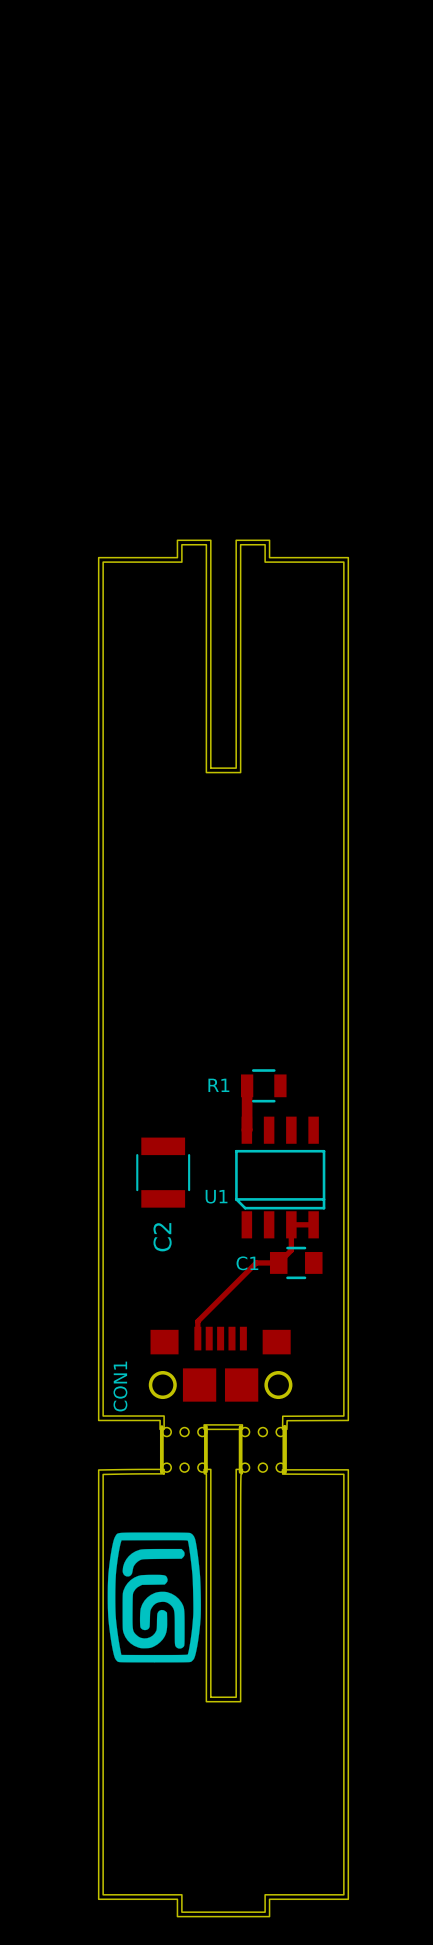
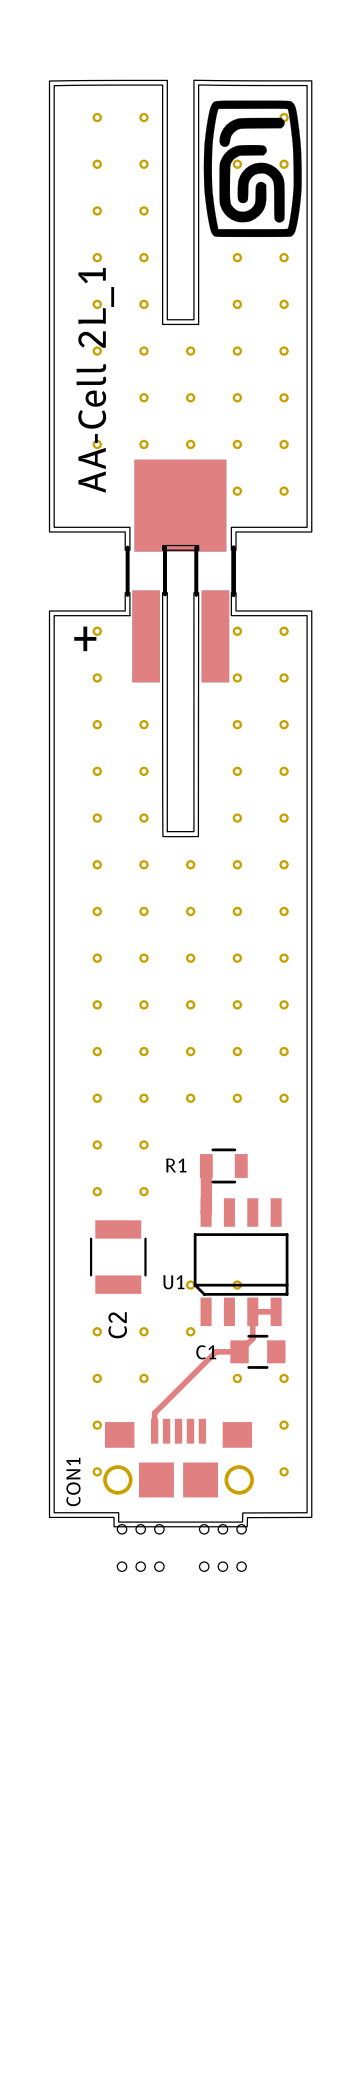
drawing: none -> [49, 80, 312, 1527]
part: none -> (97, 117)
part: none -> (143, 117)
part: none -> (284, 117)
part: none -> (97, 164)
part: none -> (143, 164)
part: none -> (237, 164)
part: none -> (284, 164)
part: none -> (97, 210)
part: none -> (143, 210)
part: none -> (97, 257)
part: none -> (143, 257)
part: none -> (237, 257)
part: none -> (284, 257)
part: none -> (97, 304)
part: none -> (143, 304)
part: none -> (237, 304)
part: none -> (284, 304)
part: none -> (97, 351)
part: none -> (143, 351)
part: none -> (190, 351)
part: none -> (237, 351)
part: none -> (284, 351)
text: none -> AA-Cell 2L_1 (95, 380)
part: none -> (143, 397)
part: none -> (190, 397)
part: none -> (237, 397)
part: none -> (284, 397)
part: none -> (97, 444)
part: none -> (143, 444)
part: none -> (190, 444)
part: none -> (237, 444)
part: none -> (284, 444)
part: none -> (237, 491)
part: none -> (284, 491)
part: none -> (180, 505)
board edge: none -> (127, 547) (127, 594)
board edge: none -> (164, 547) (164, 594)
board edge: none -> (196, 547) (196, 594)
board edge: none -> (233, 547) (233, 594)
drawing: [98, 540, 349, 1917] -> none
part: none -> (97, 631)
part: none -> (237, 631)
part: none -> (284, 631)
part: none -> (180, 636)
text: none -> + (85, 638)
part: none -> (97, 677)
part: none -> (237, 677)
part: none -> (284, 677)
part: none -> (97, 724)
part: none -> (143, 724)
part: none -> (237, 724)
part: none -> (284, 724)
part: none -> (97, 771)
part: none -> (143, 771)
part: none -> (237, 771)
part: none -> (284, 771)
part: none -> (97, 818)
part: none -> (143, 818)
part: none -> (237, 818)
part: none -> (284, 818)
part: none -> (97, 864)
part: none -> (143, 864)
part: none -> (190, 864)
part: none -> (237, 864)
part: none -> (284, 864)
part: none -> (97, 911)
part: none -> (143, 911)
part: none -> (190, 911)
part: none -> (237, 911)
part: none -> (284, 911)
part: none -> (97, 958)
part: none -> (143, 958)
part: none -> (190, 958)
part: none -> (237, 958)
part: none -> (284, 958)
part: none -> (97, 1004)
part: none -> (143, 1004)
part: none -> (190, 1004)
part: none -> (237, 1004)
part: none -> (284, 1004)
part: none -> (97, 1051)
part: none -> (143, 1051)
part: none -> (190, 1051)
part: none -> (237, 1051)
part: none -> (284, 1051)
part: none -> (97, 1098)
part: none -> (143, 1098)
part: none -> (190, 1098)
part: none -> (237, 1098)
part: none -> (284, 1098)
part: none -> (97, 1144)
part: none -> (143, 1144)
part: none -> (97, 1191)
part: none -> (143, 1191)
part: none -> (190, 1285)
part: none -> (237, 1285)
part: none -> (97, 1331)
part: none -> (143, 1331)
part: none -> (190, 1331)
part: none -> (97, 1378)
part: none -> (143, 1378)
part: none -> (237, 1378)
part: none -> (284, 1378)
part: none -> (97, 1425)
part: none -> (284, 1425)
part: none -> (97, 1471)
part: none -> (284, 1471)
board edge: (205, 1426) (205, 1471) -> none
board edge: (161, 1427) (161, 1472) -> none
board edge: (240, 1427) (240, 1472) -> none
board edge: (284, 1427) (284, 1472) -> none

